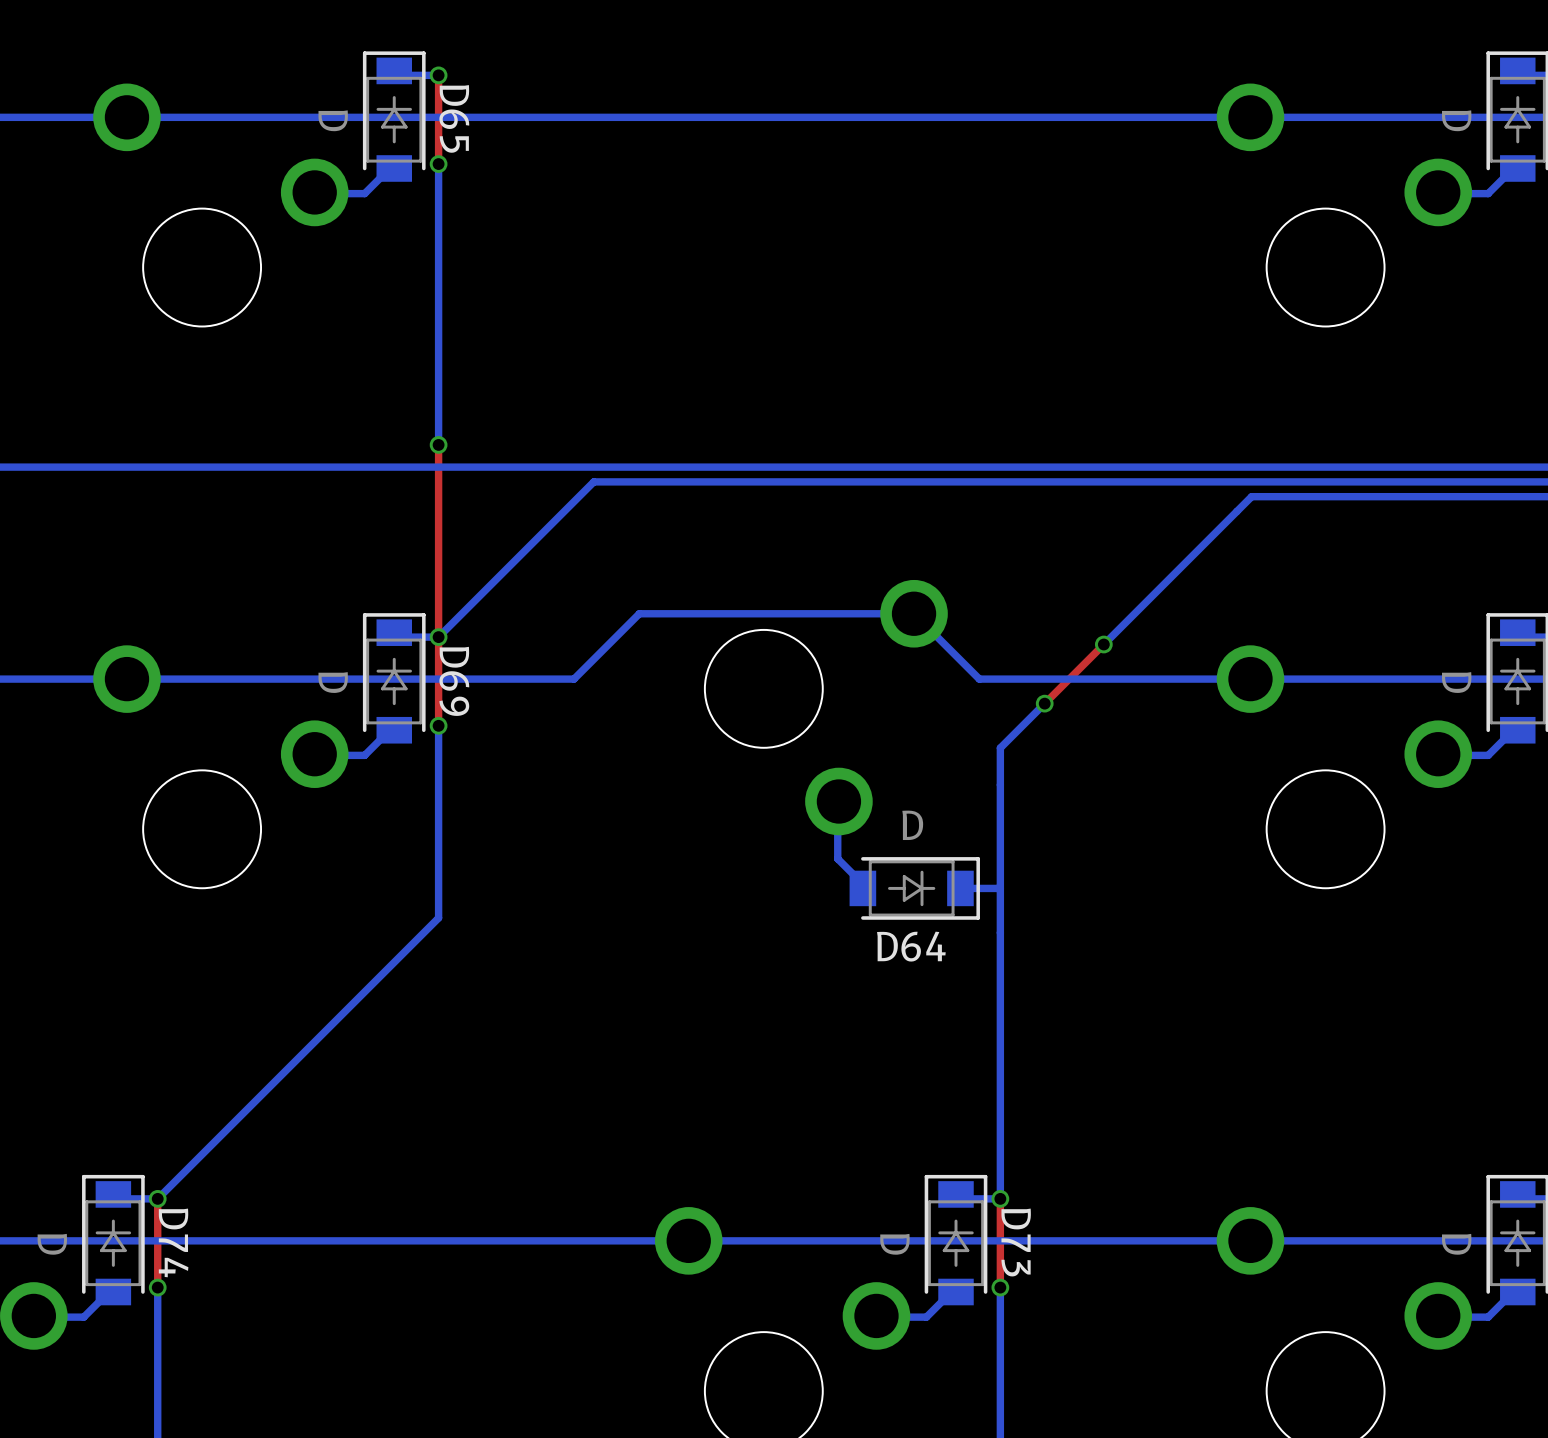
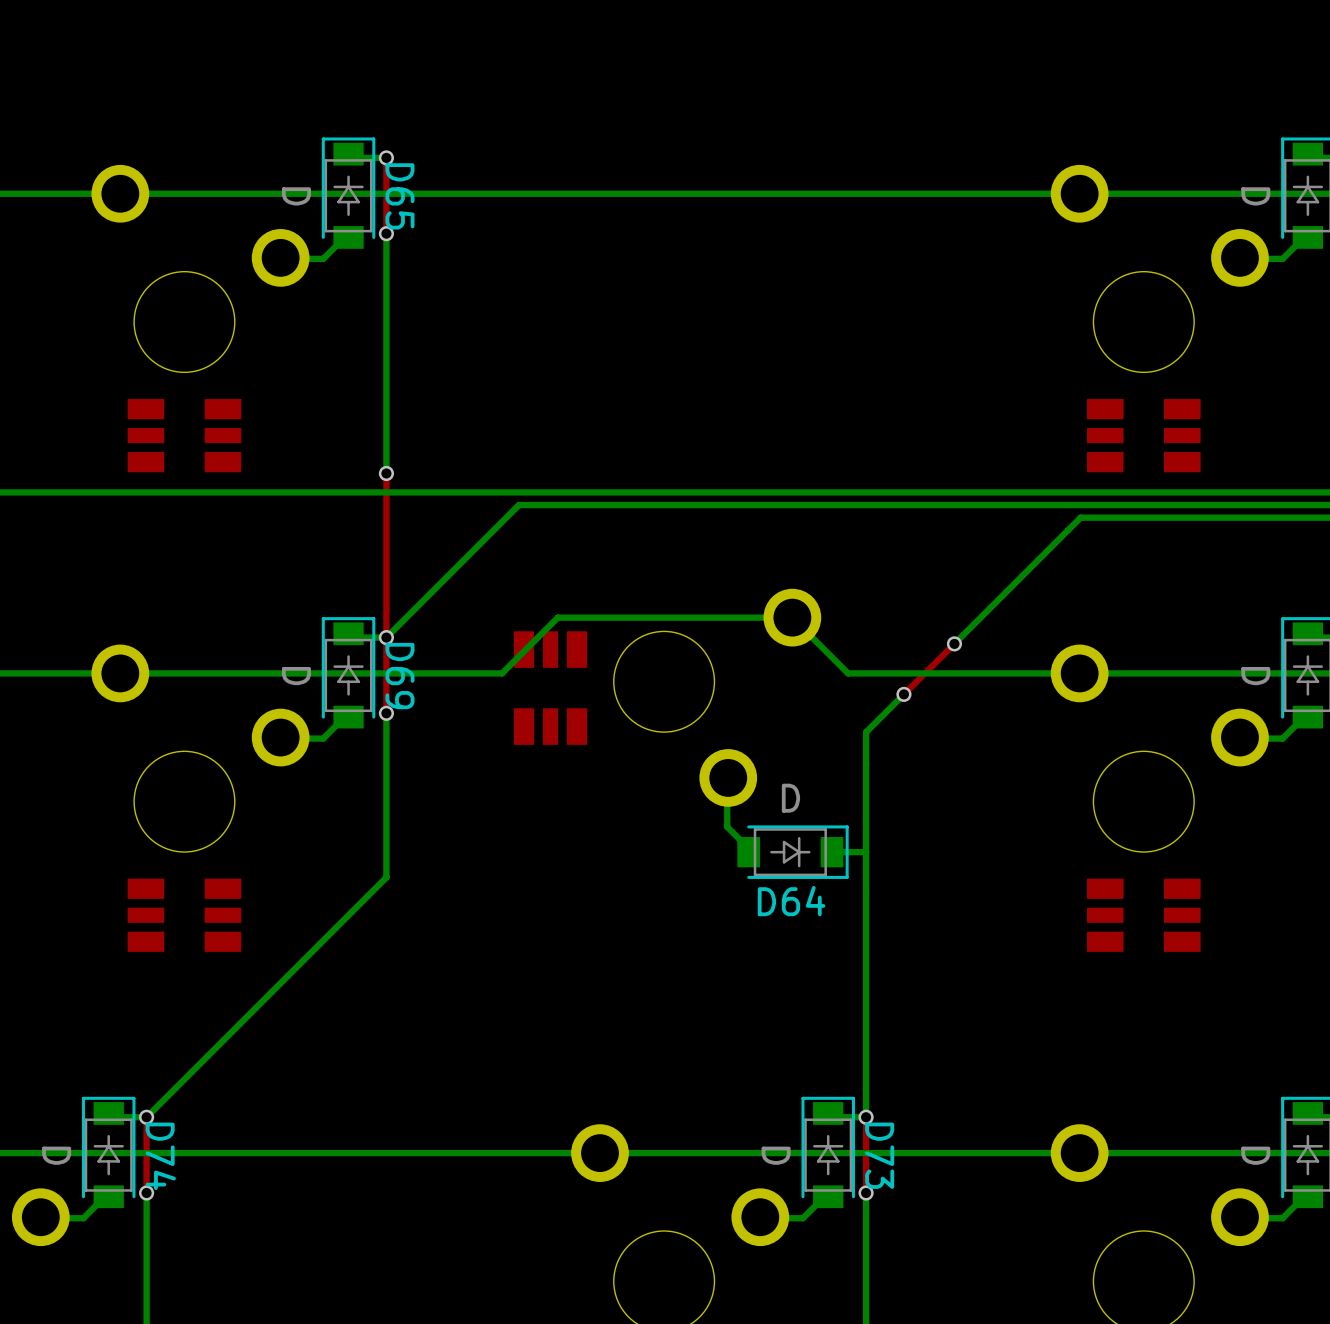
part: none -> (184, 435)
part: none -> (1143, 435)
part: none -> (550, 688)
part: none -> (184, 915)
part: none -> (1143, 915)

